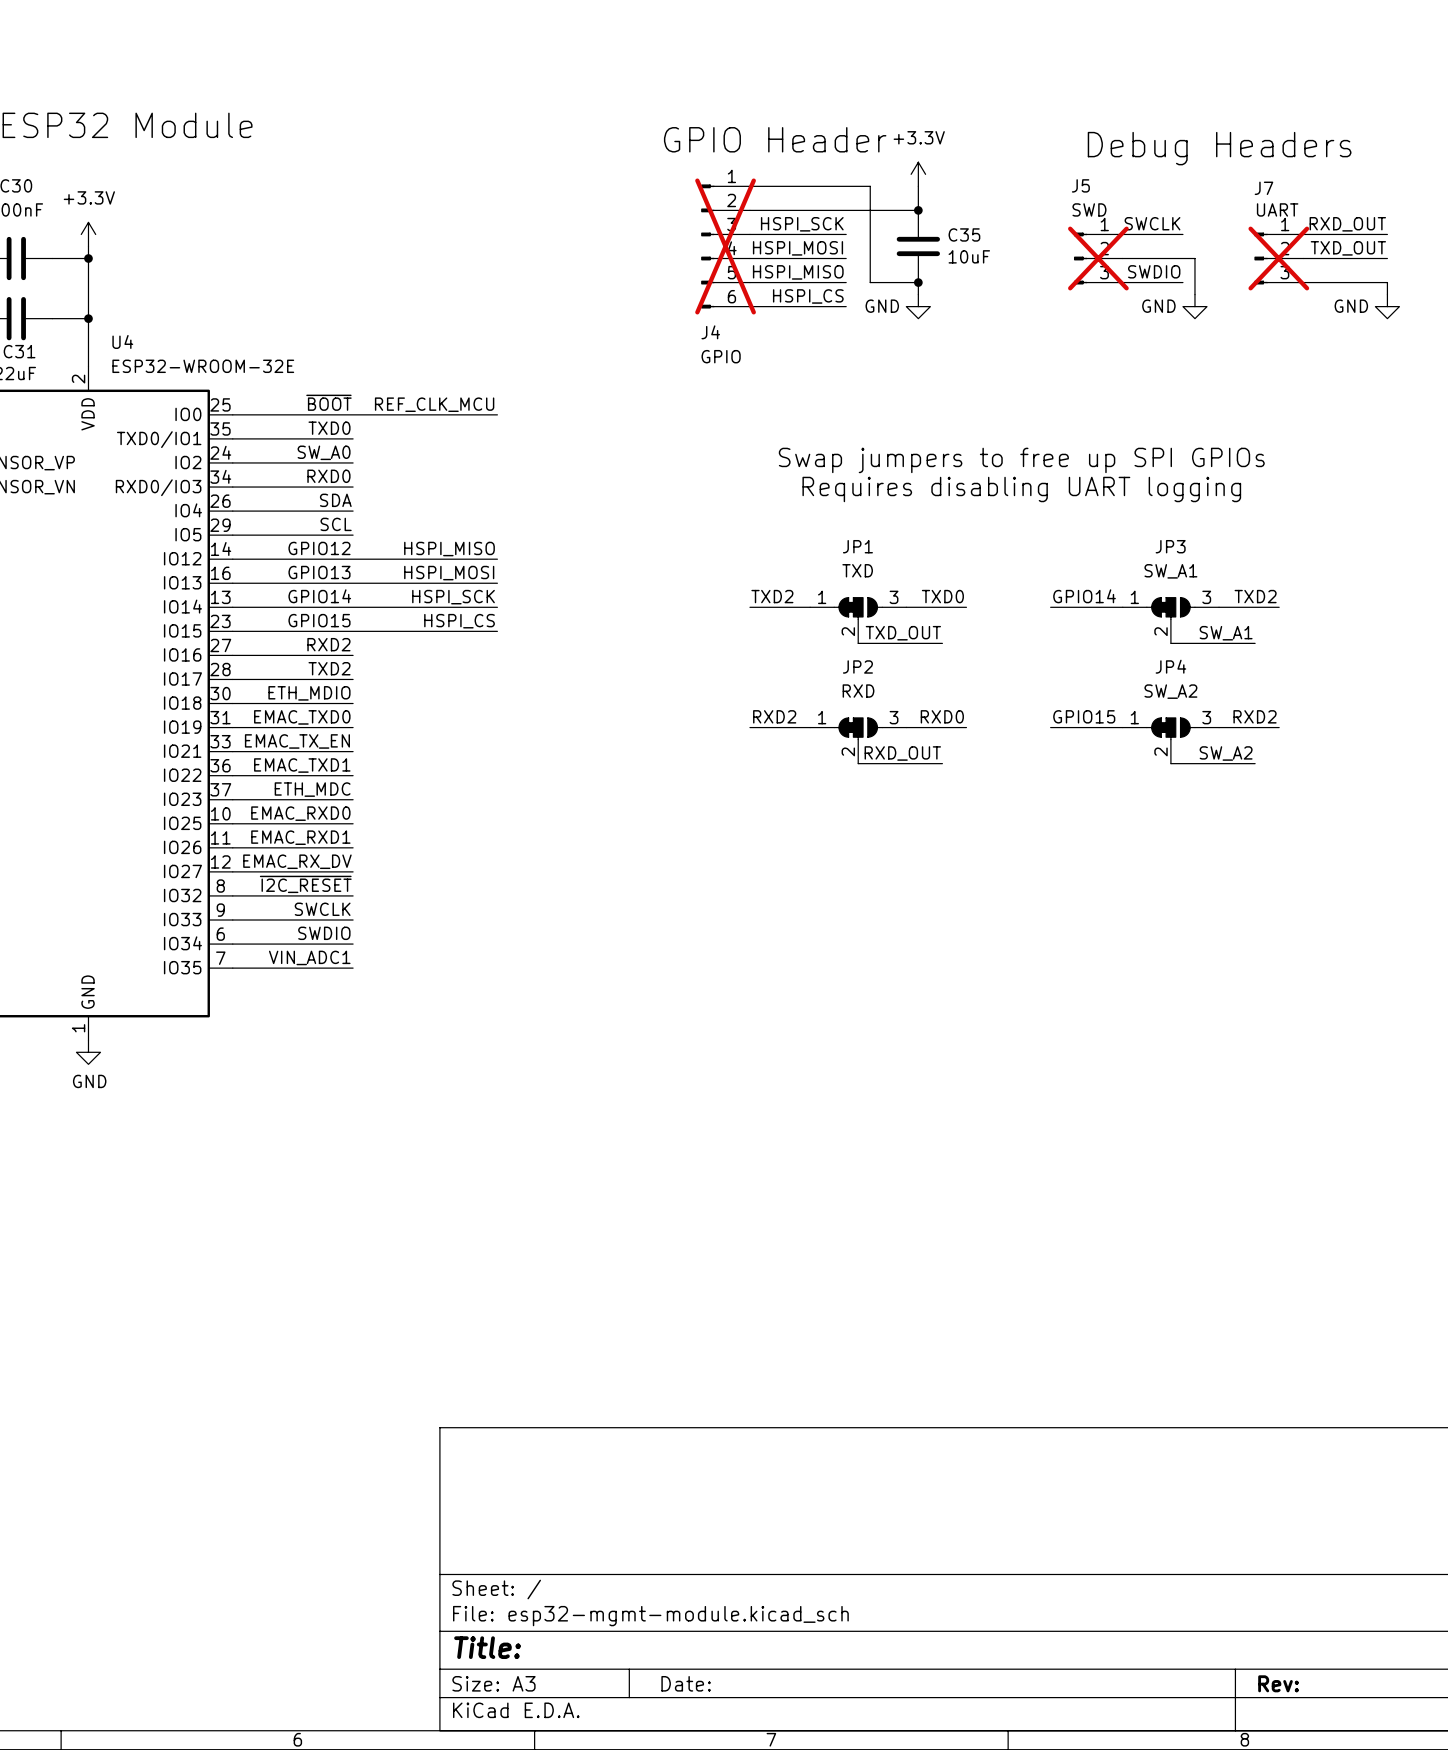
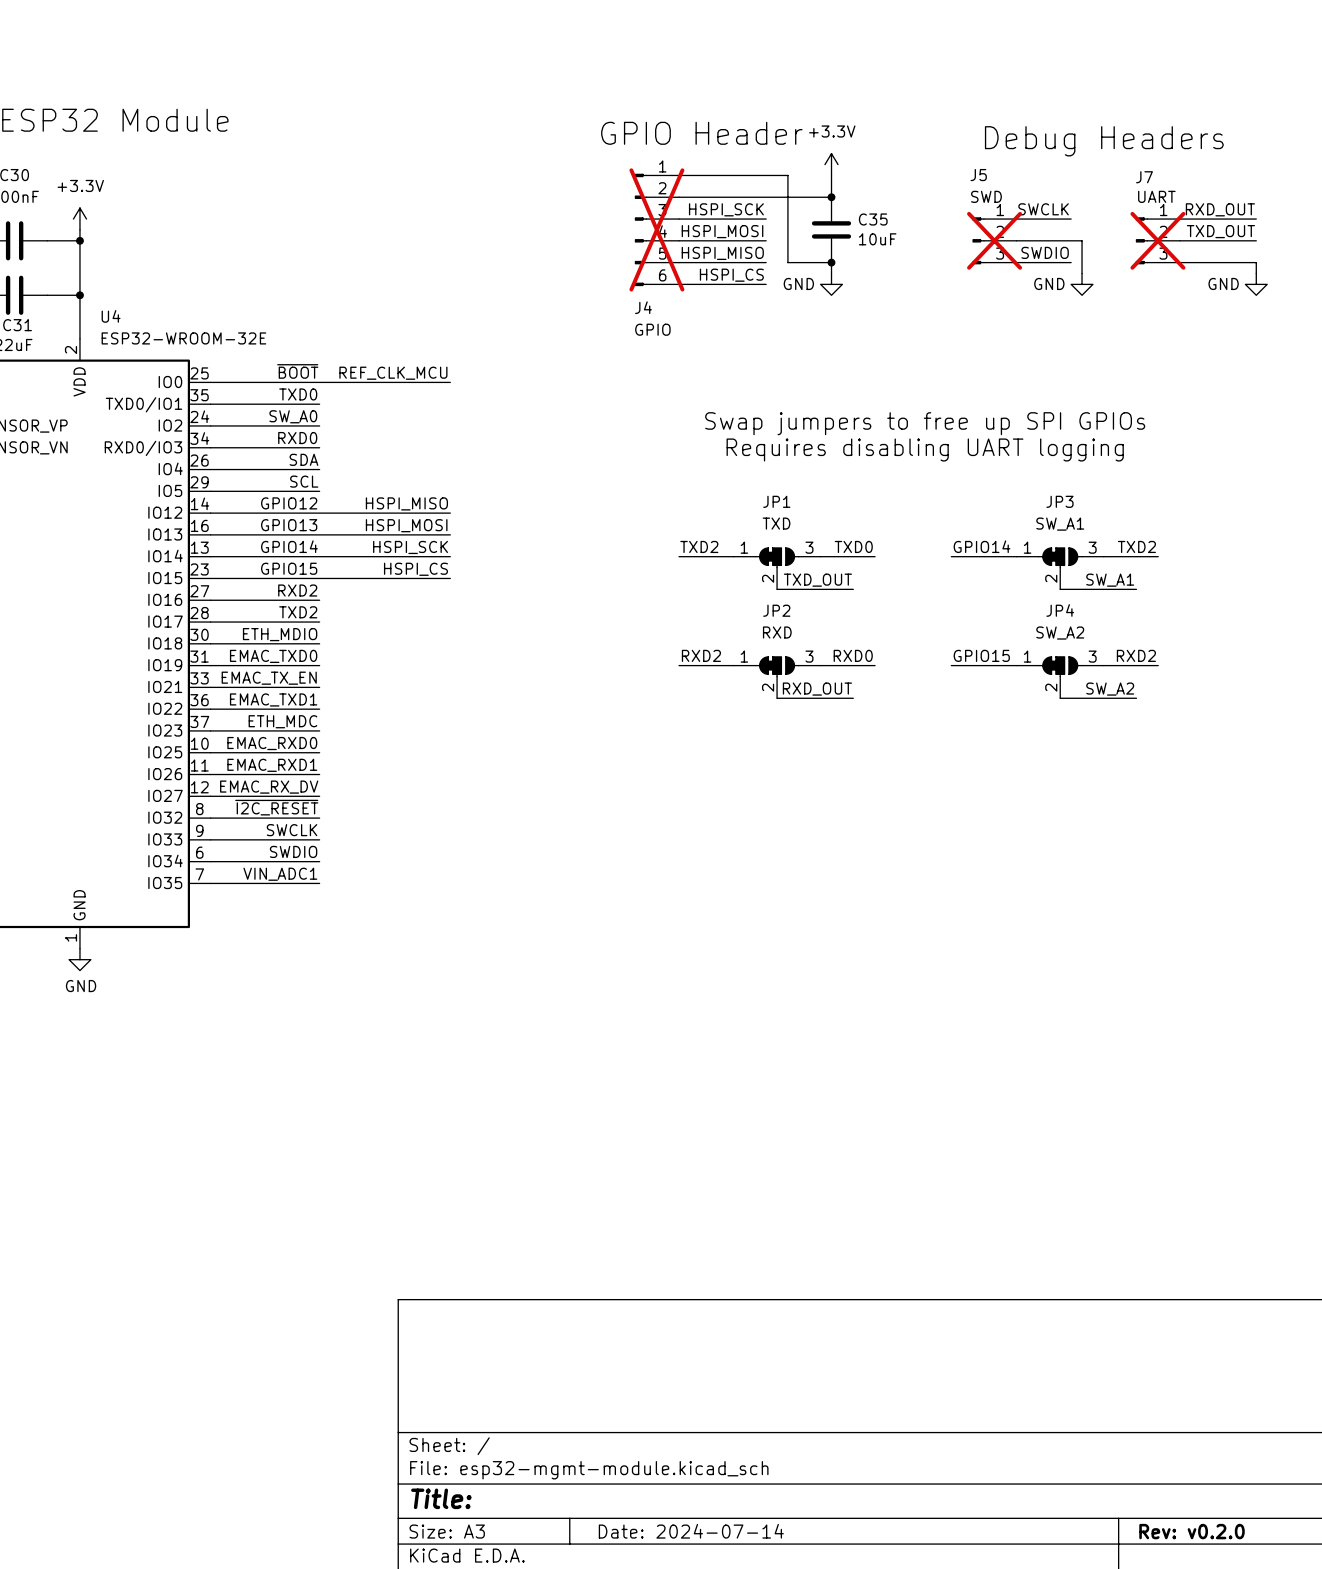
title block: Date: (686, 1683) -> Date: 2024-07-14 (691, 1531)
title block: Rev: (1278, 1683) -> Rev: v0.2.0 (1192, 1531)

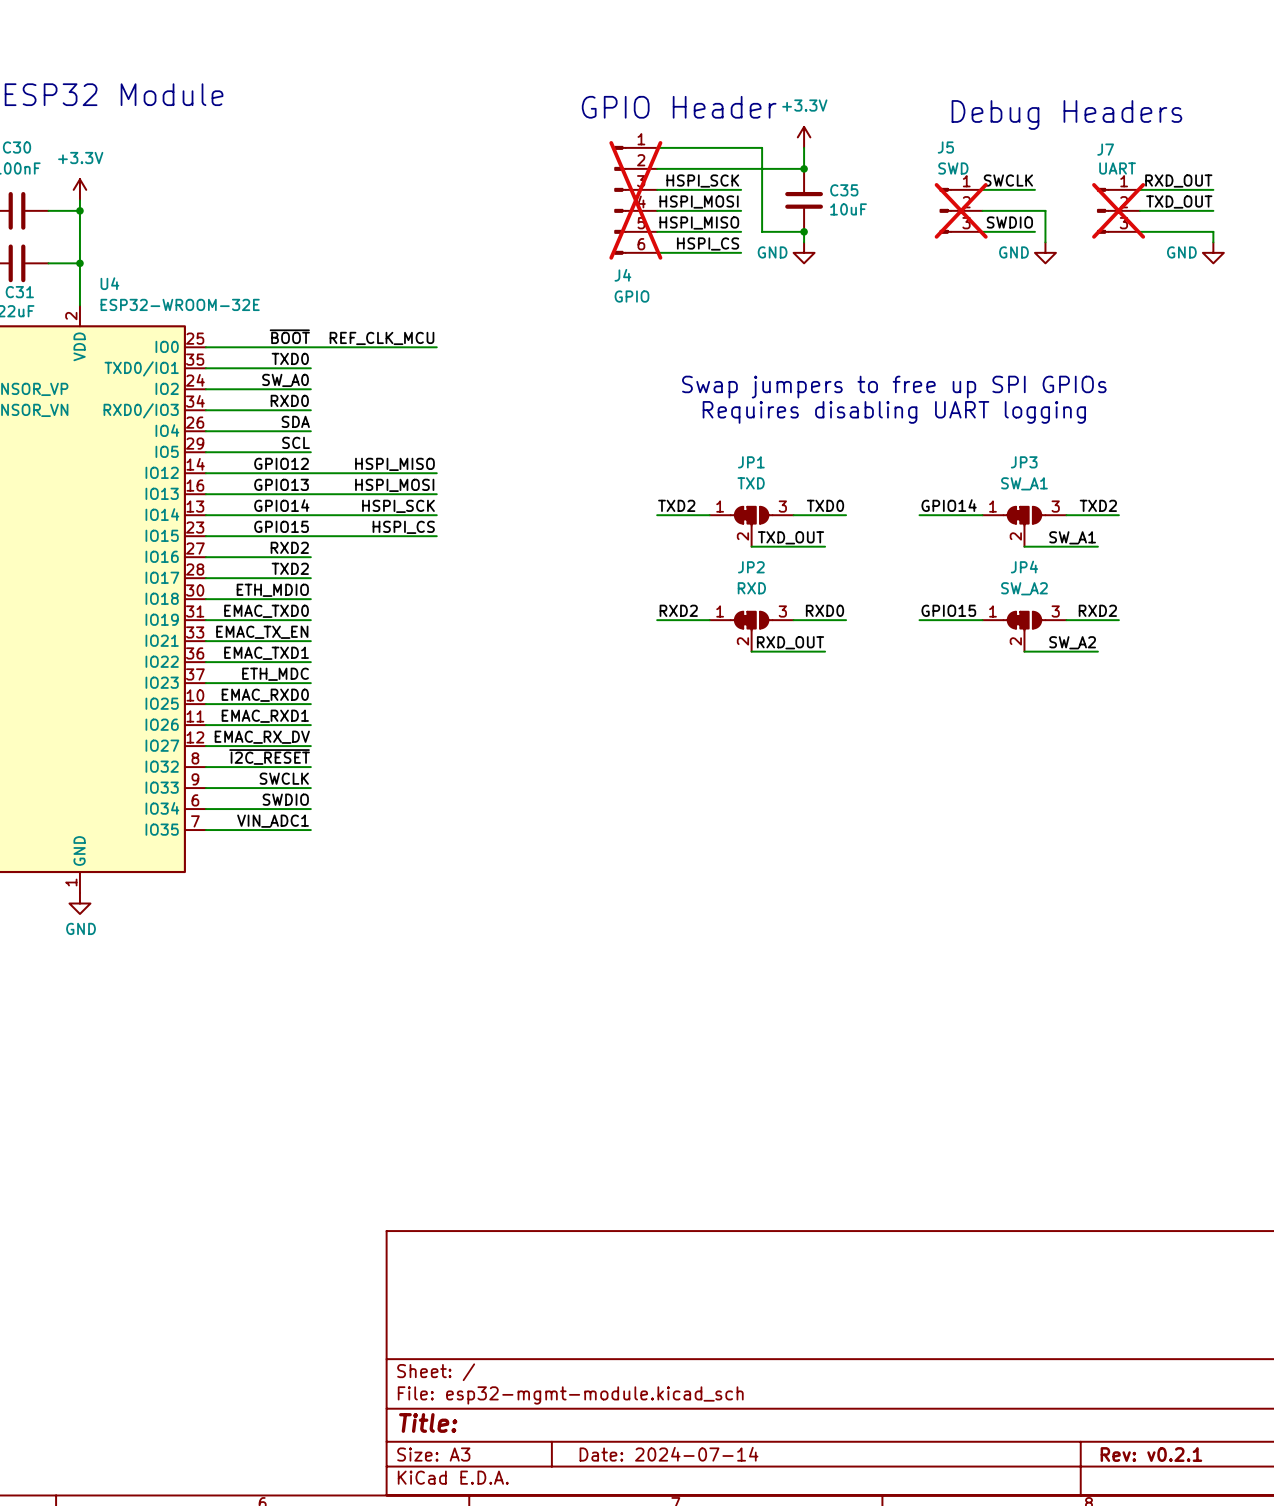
title block: Rev: v0.2.0 (1192, 1531) -> Rev: v0.2.1 (1151, 1454)

